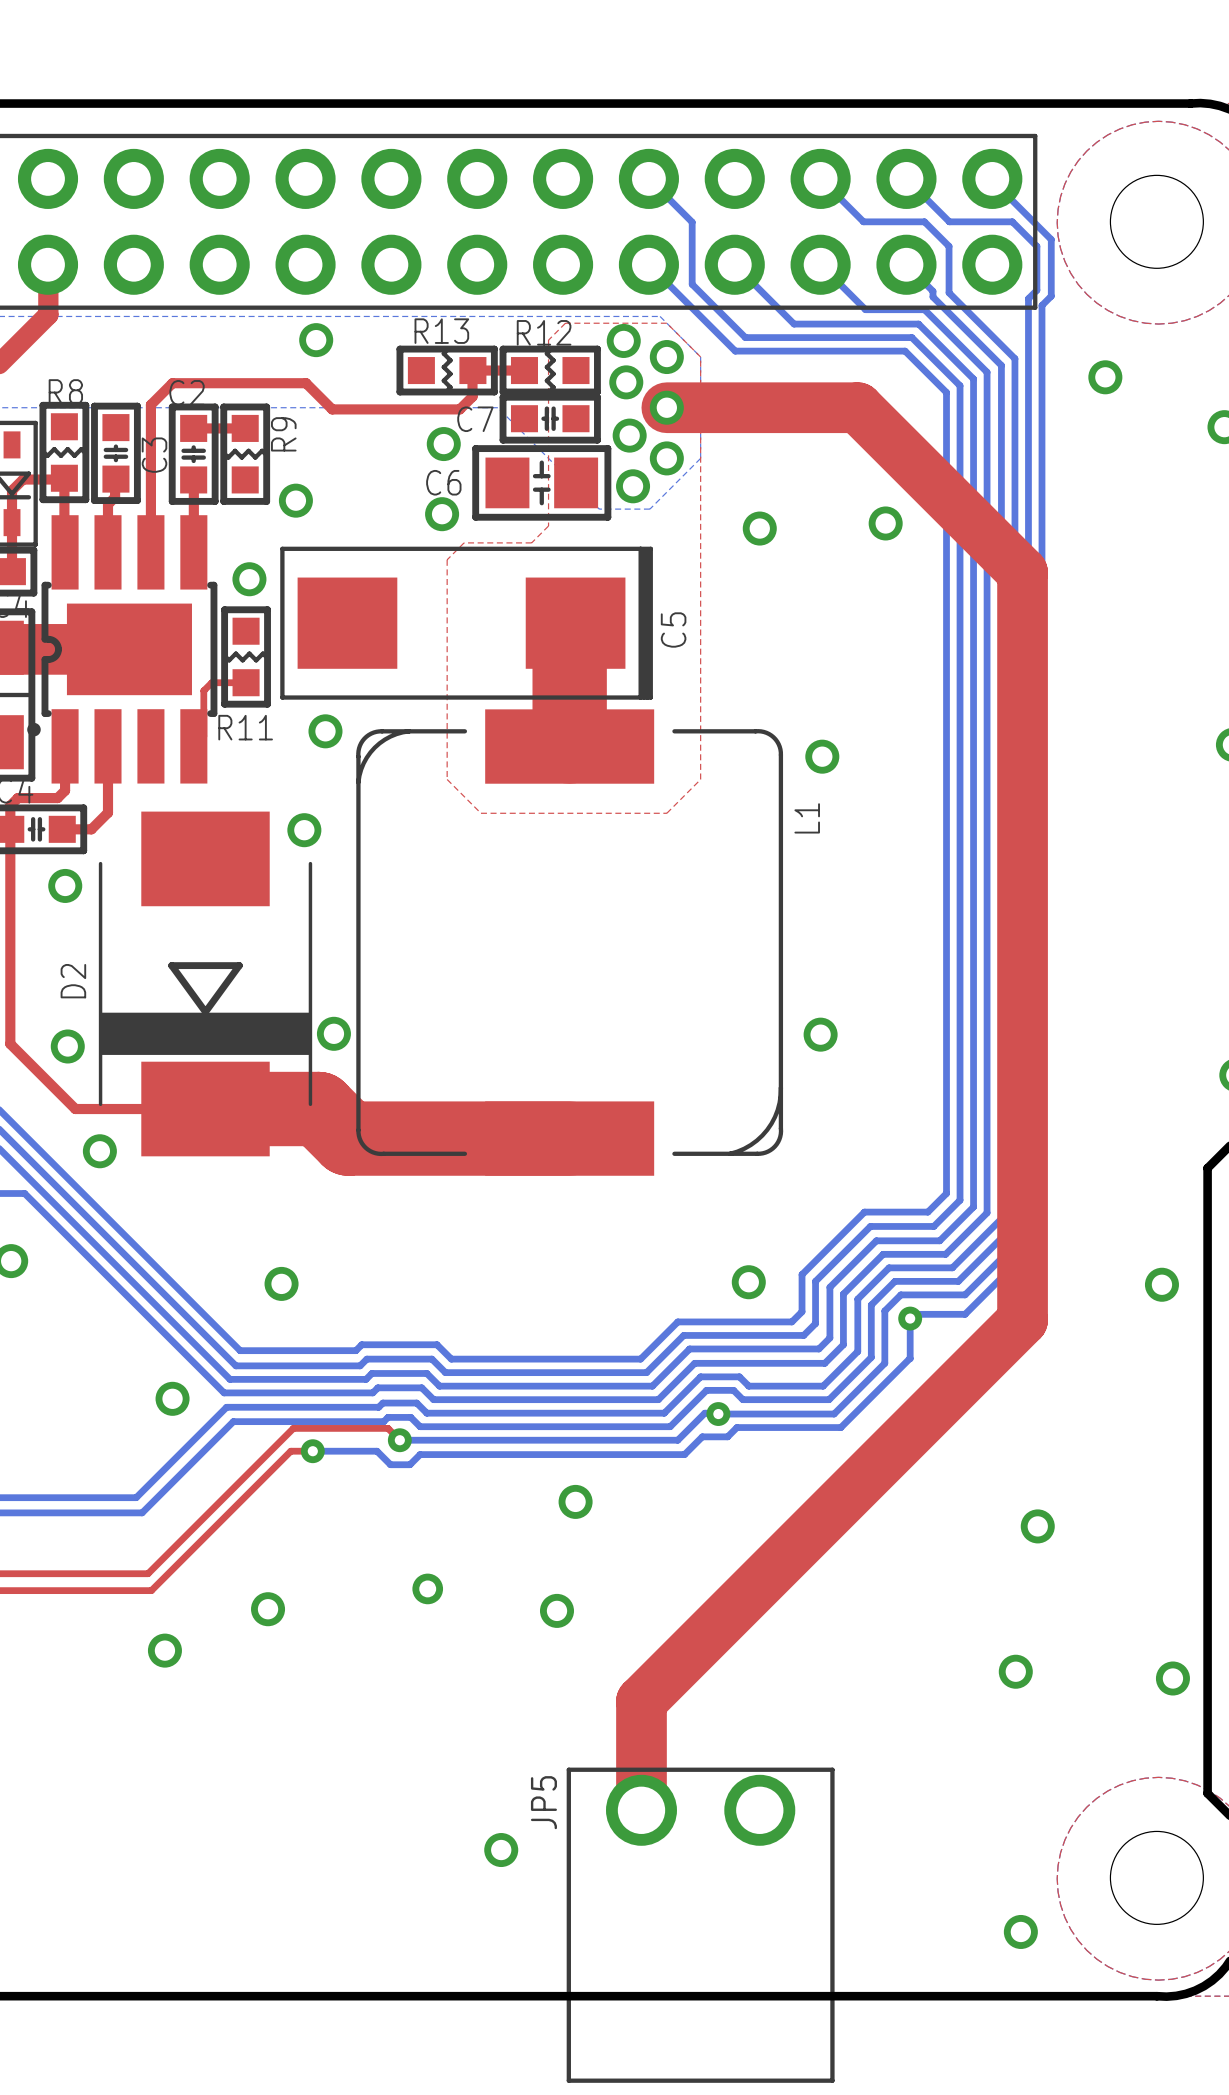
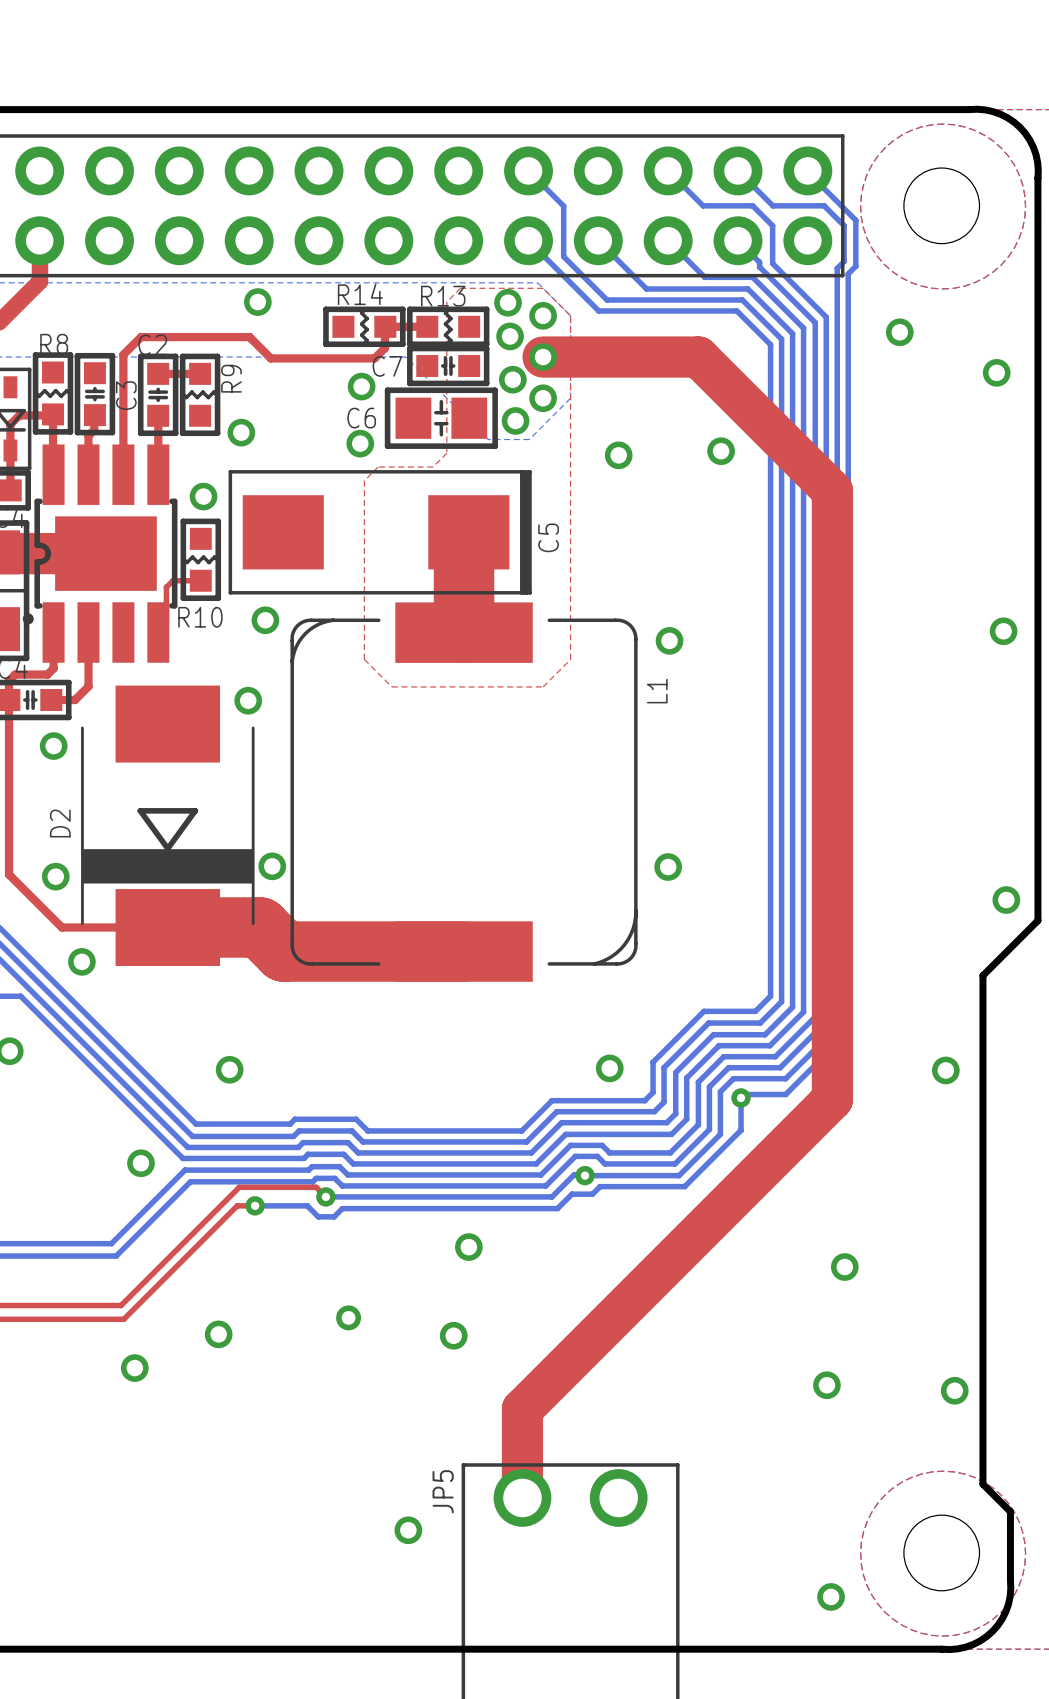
R13 name: R13 (441, 331) -> R14 (360, 294)
R12 name: R12 (544, 332) -> R13 (443, 296)
R11 name: R11 (245, 727) -> R10 (200, 617)

